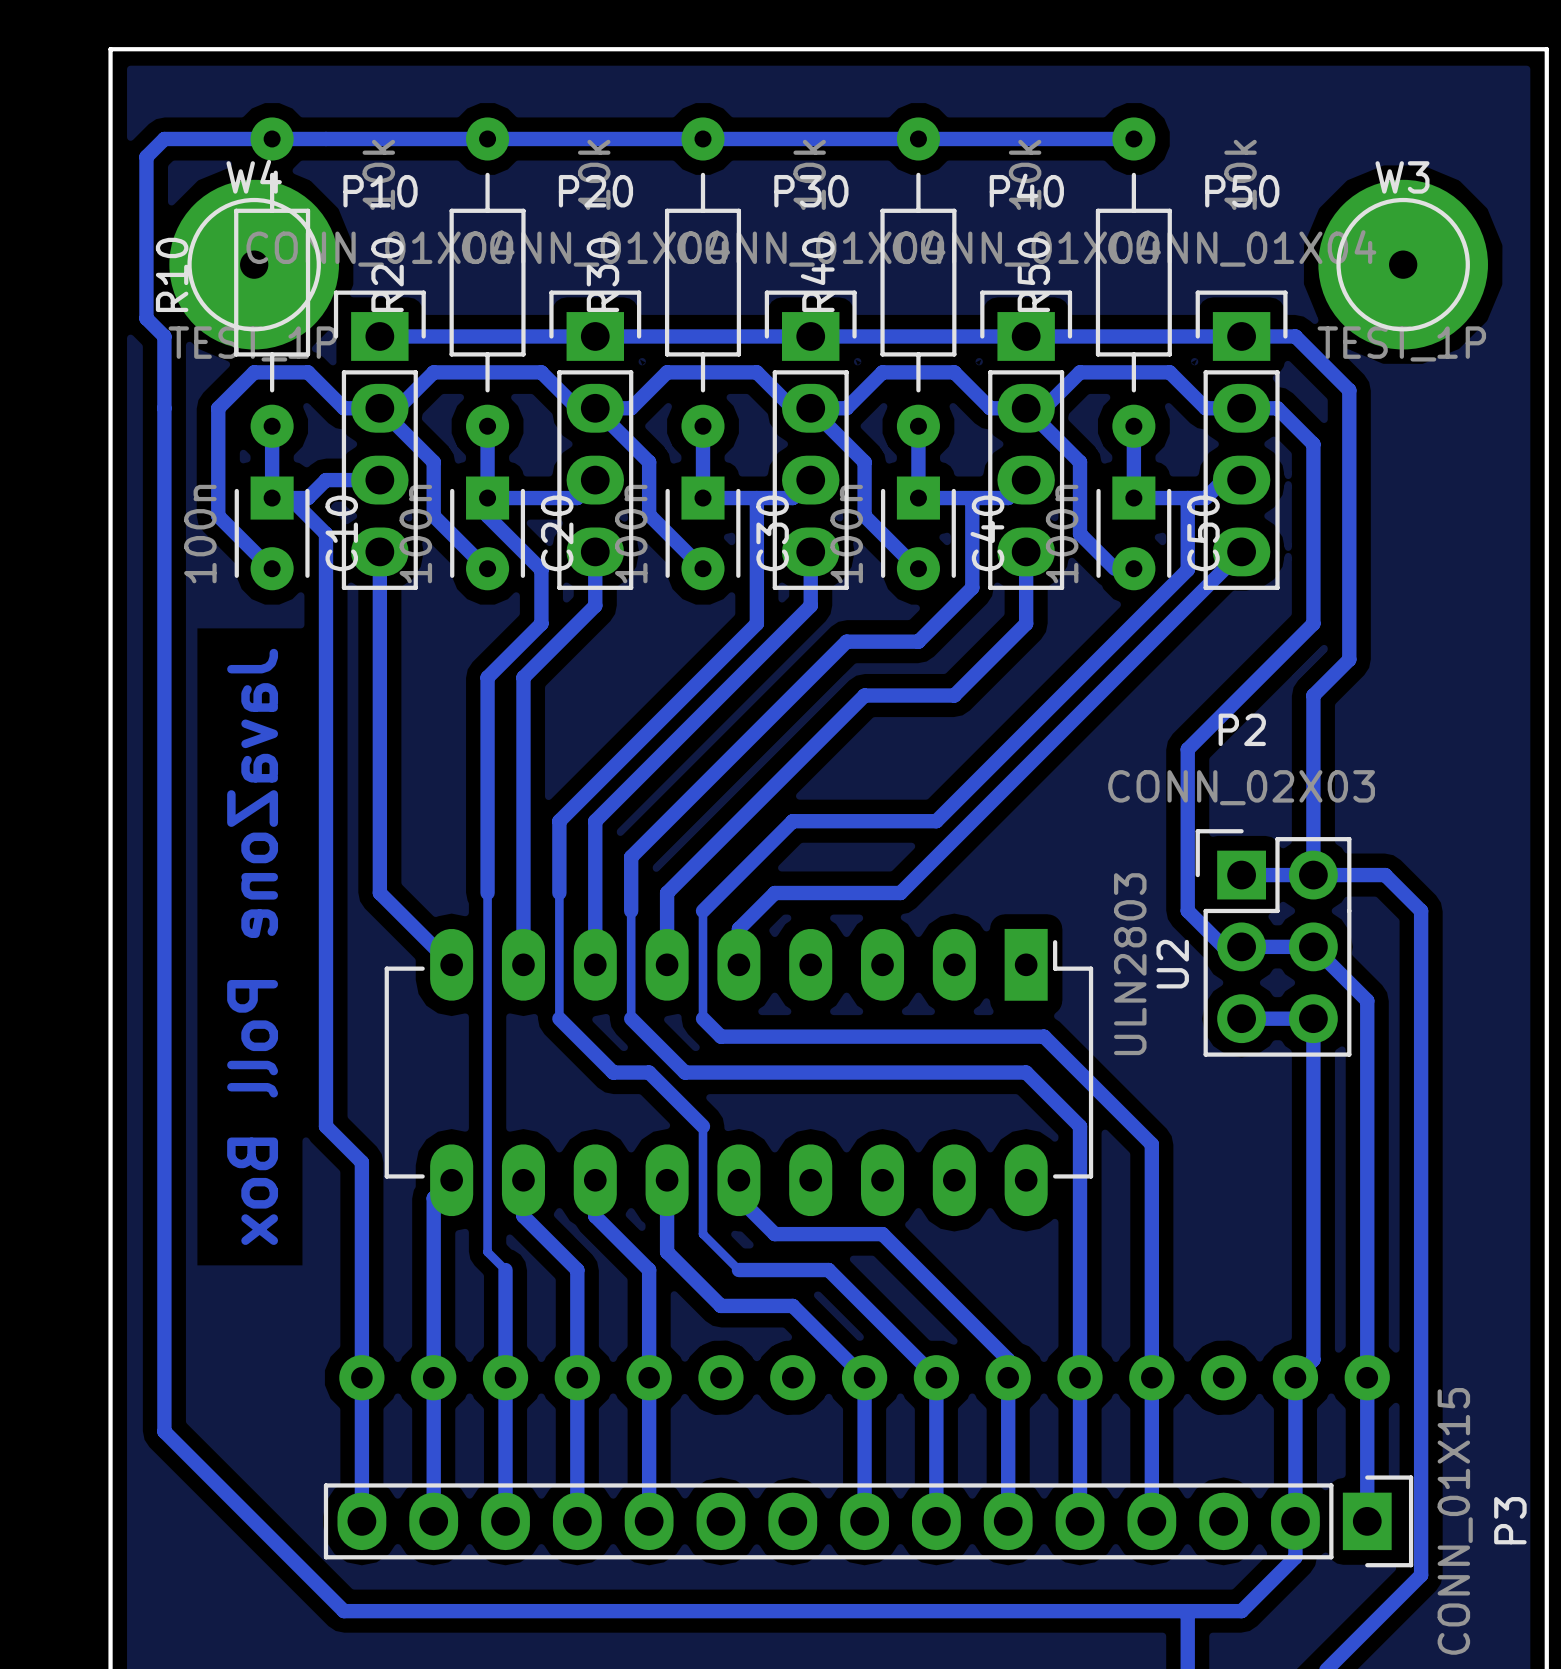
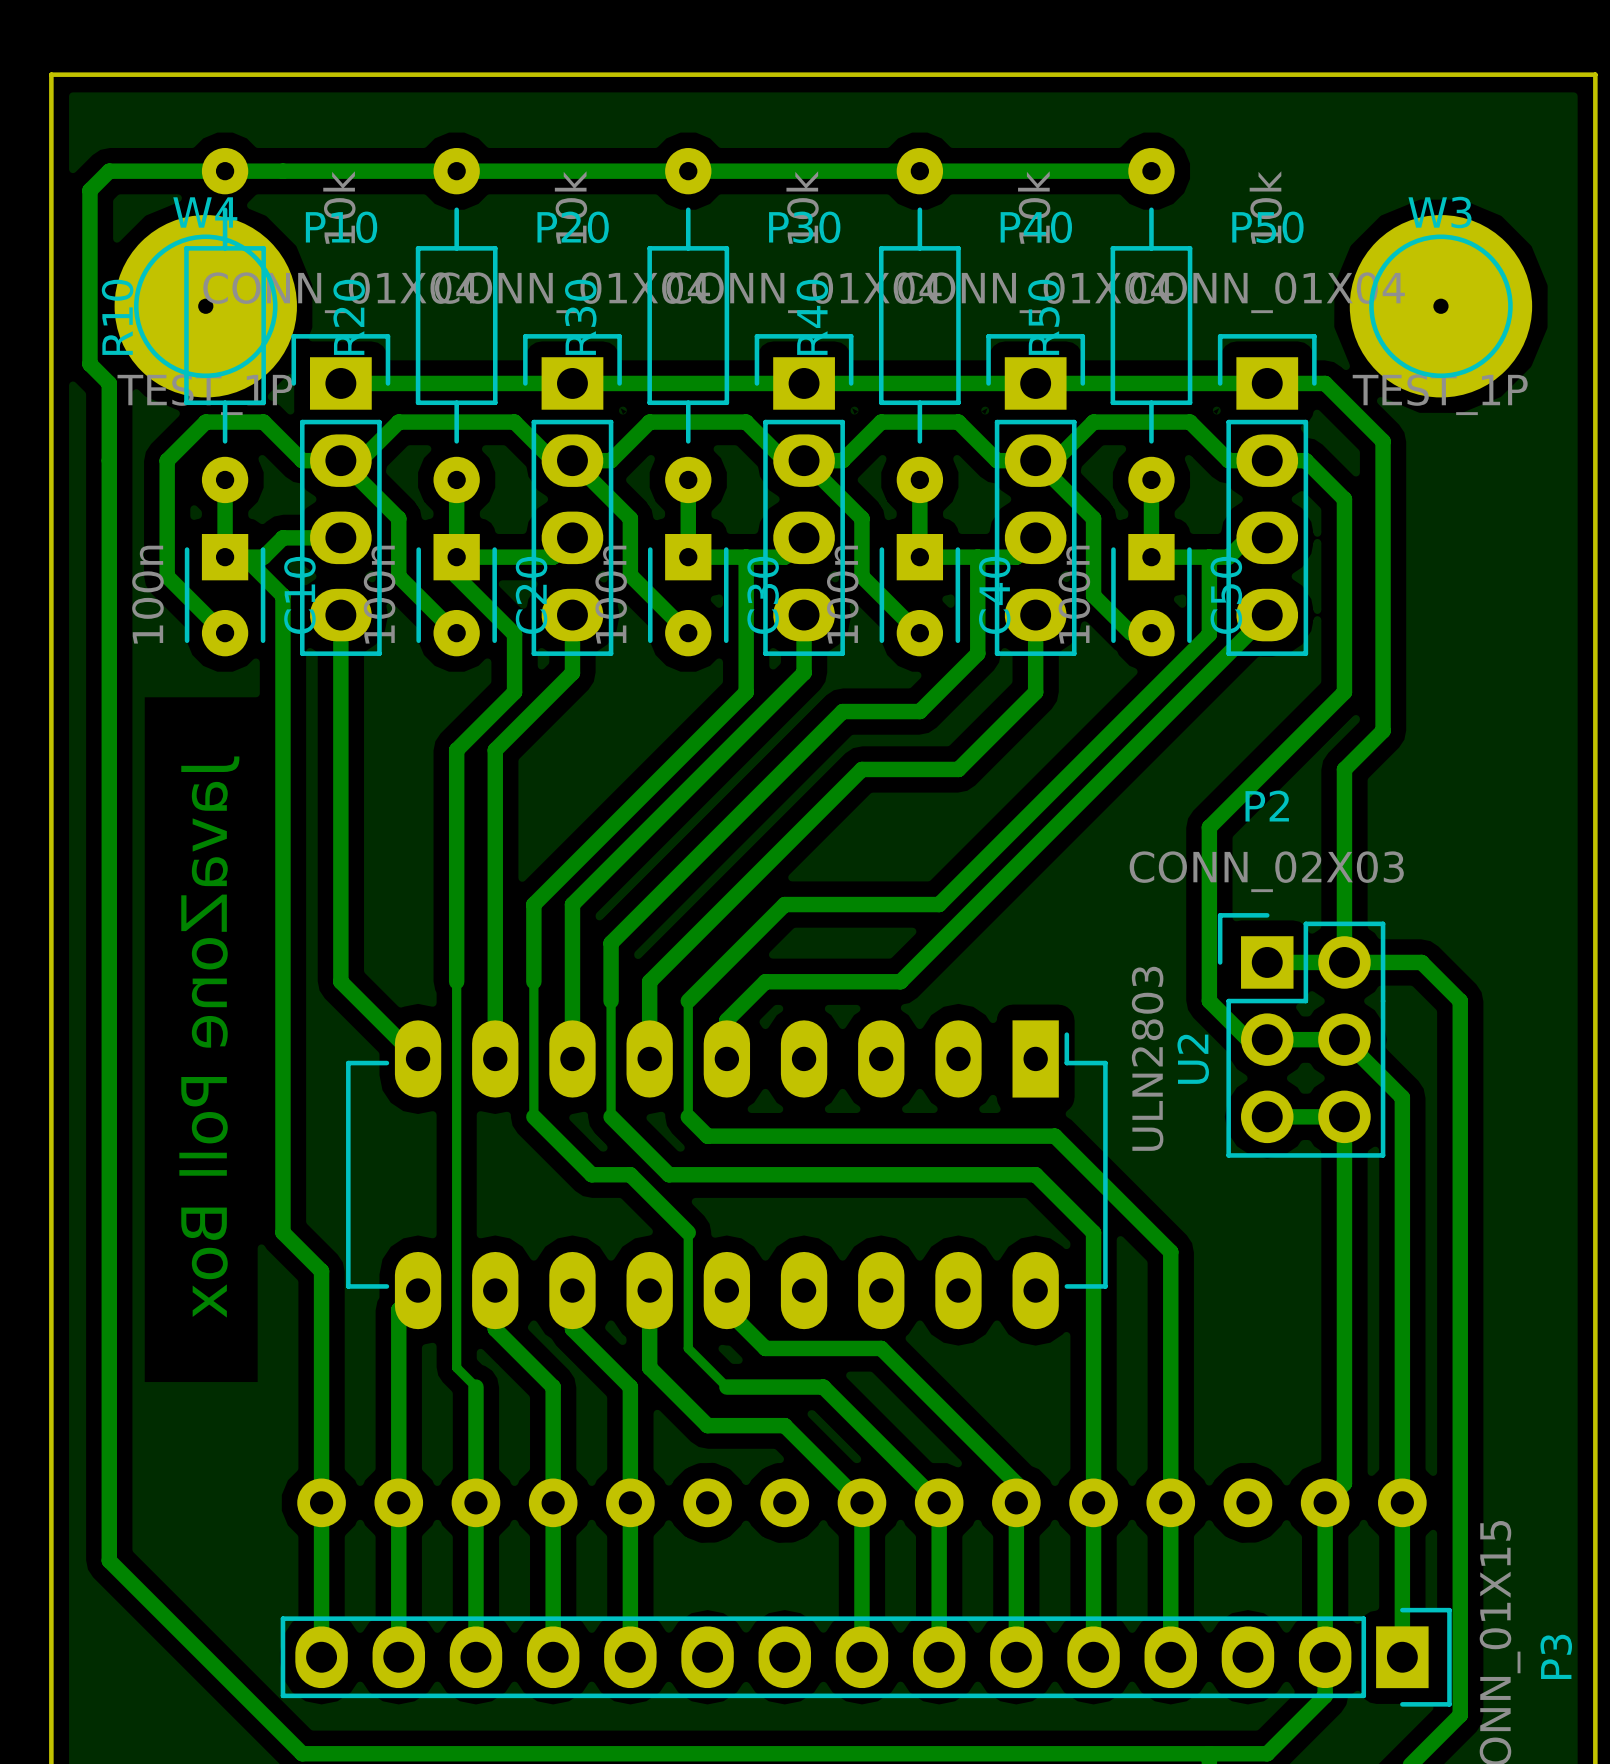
W4 footprint: [169, 179, 339, 350] -> [114, 215, 297, 398]
W3 footprint: [1318, 179, 1488, 350] -> [1349, 215, 1533, 398]

